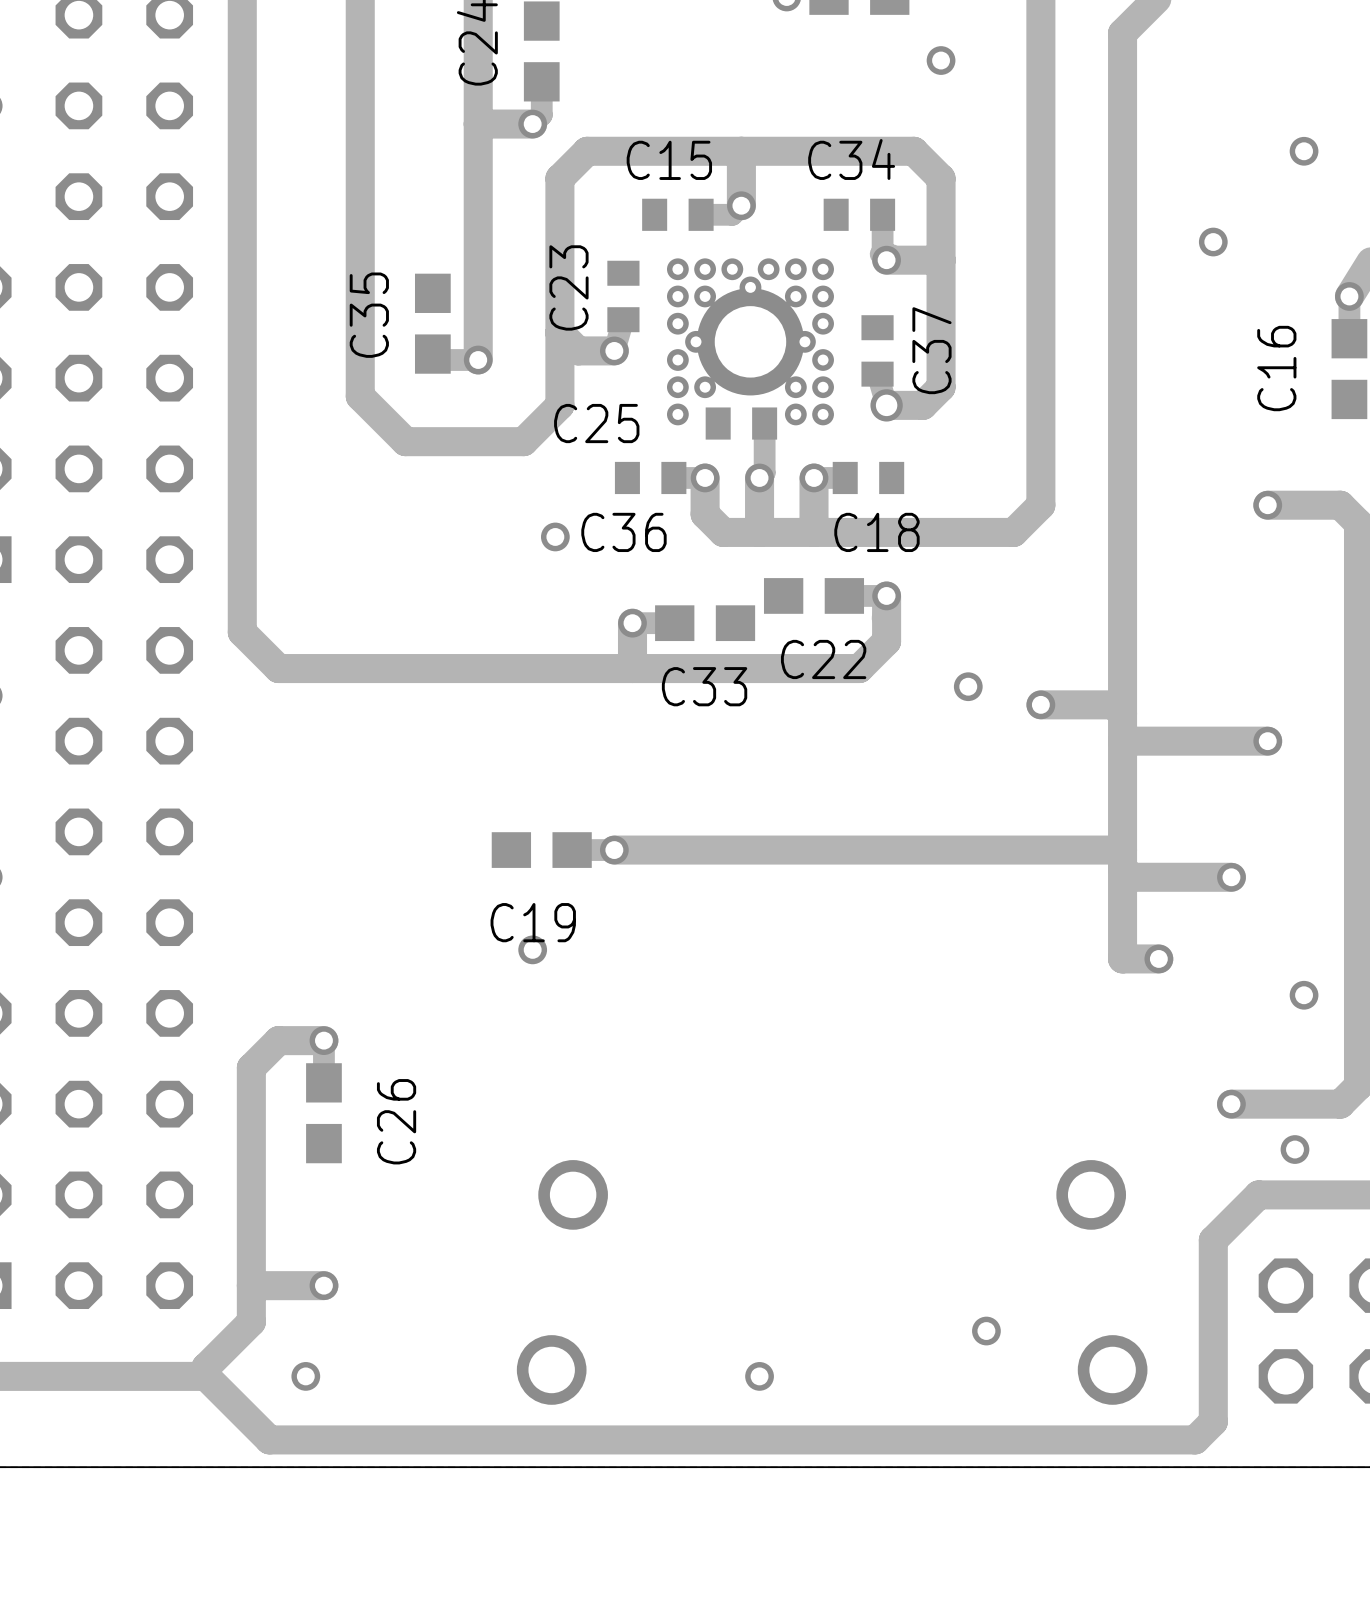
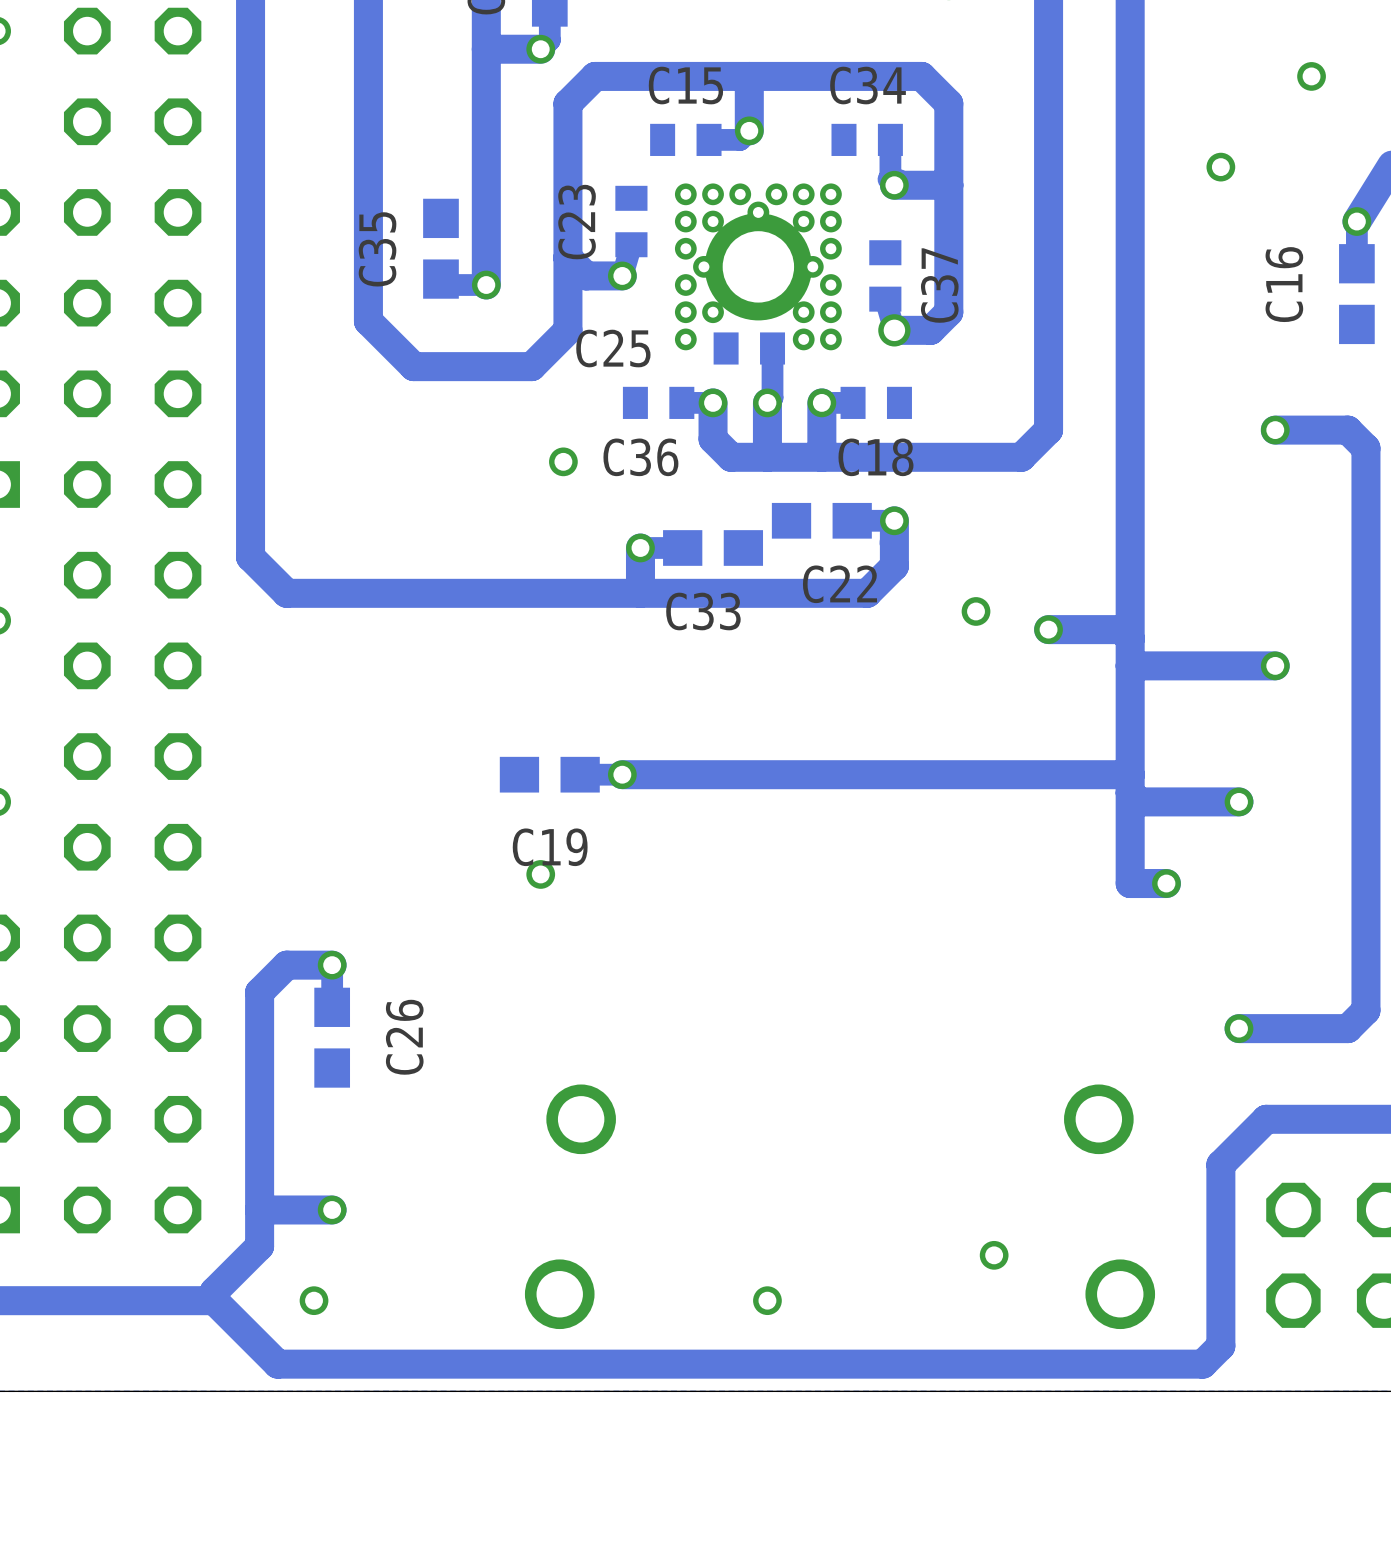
via: (1304, 995) -> none
via: (1294, 1149) -> none

